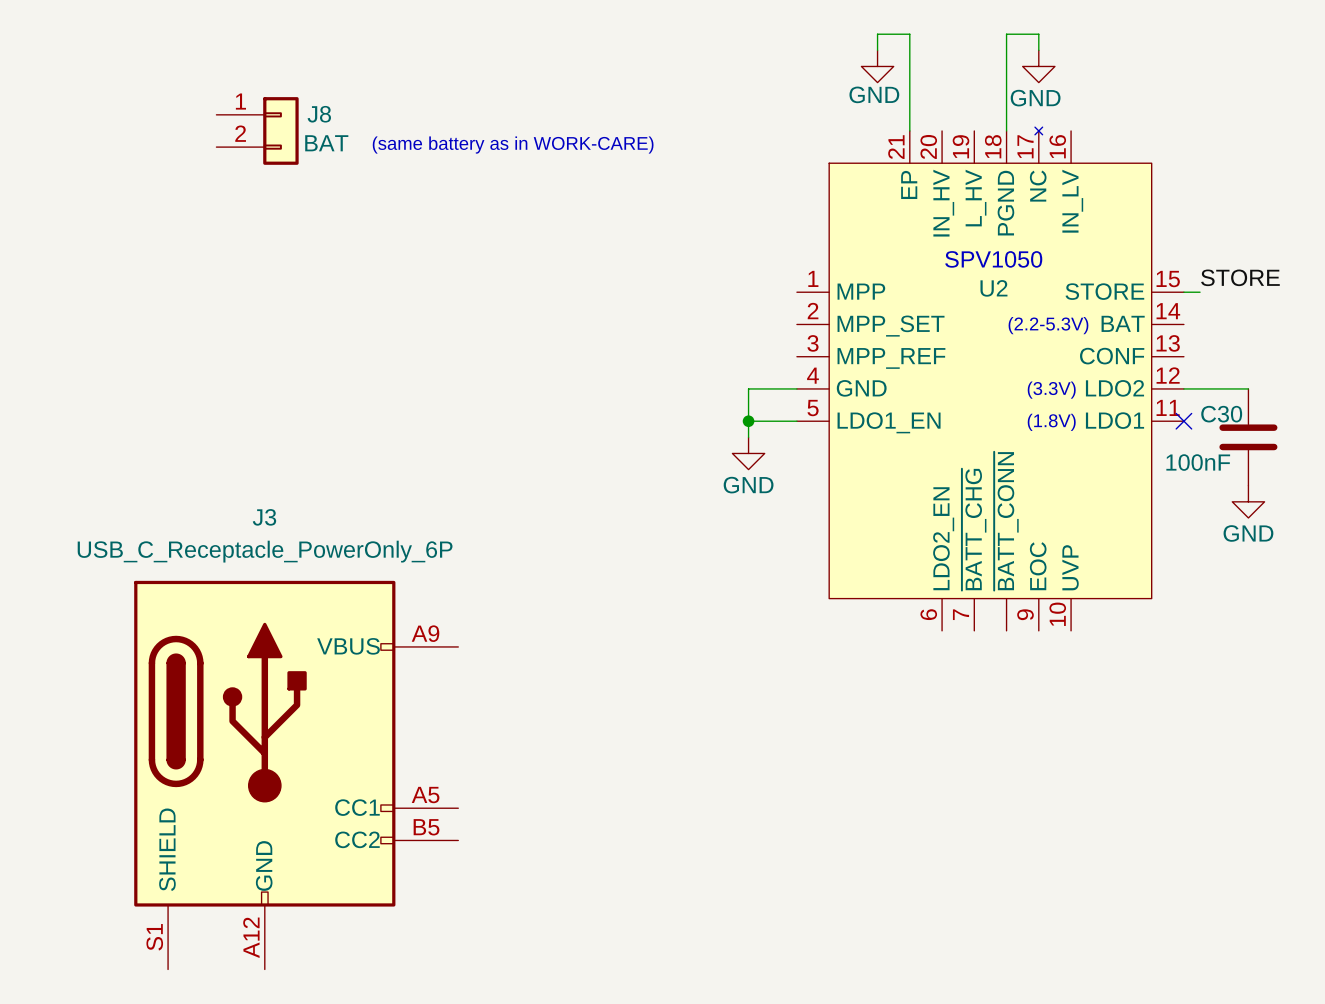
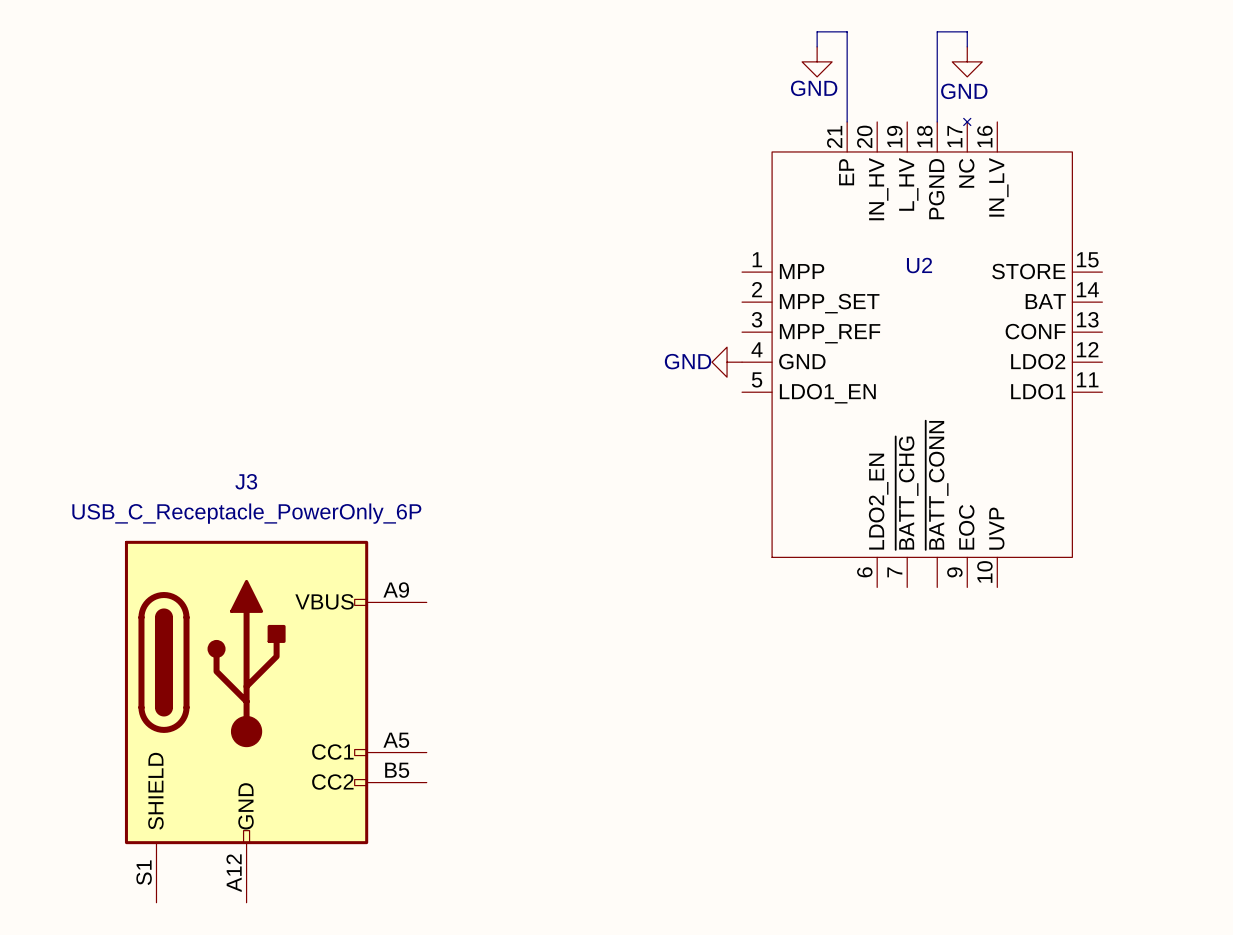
U2 symbol: [796, 127, 1184, 631] -> [742, 118, 1103, 588]
J8: BAT (257, 130) -> none
text: (same battery as in WORK-CARE) (513, 145) -> none
text: SPV1050 (993, 259) -> none
label: STORE (1240, 277) -> none
wire: (1183, 292) (1200, 292) -> none
text: (2.2-5.3V) (1048, 325) -> none
wire: (796, 388) (748, 388) (748, 437) -> none
wire: (1183, 388) (1248, 388) -> none
text: (3.3V) (1051, 390) -> none
wire: (748, 421) (796, 421) -> none
junction: (748, 421) -> none
no-connect mark: (1183, 421) -> none
text: (1.8V) (1051, 422) -> none
C30: 100nF (1248, 437) -> none
power symbol rotation: 0° (748, 453) -> 90° clockwise (727, 362)
power symbol position: GND (748, 453) -> GND (727, 362)
power symbol: GND (1248, 501) -> none

